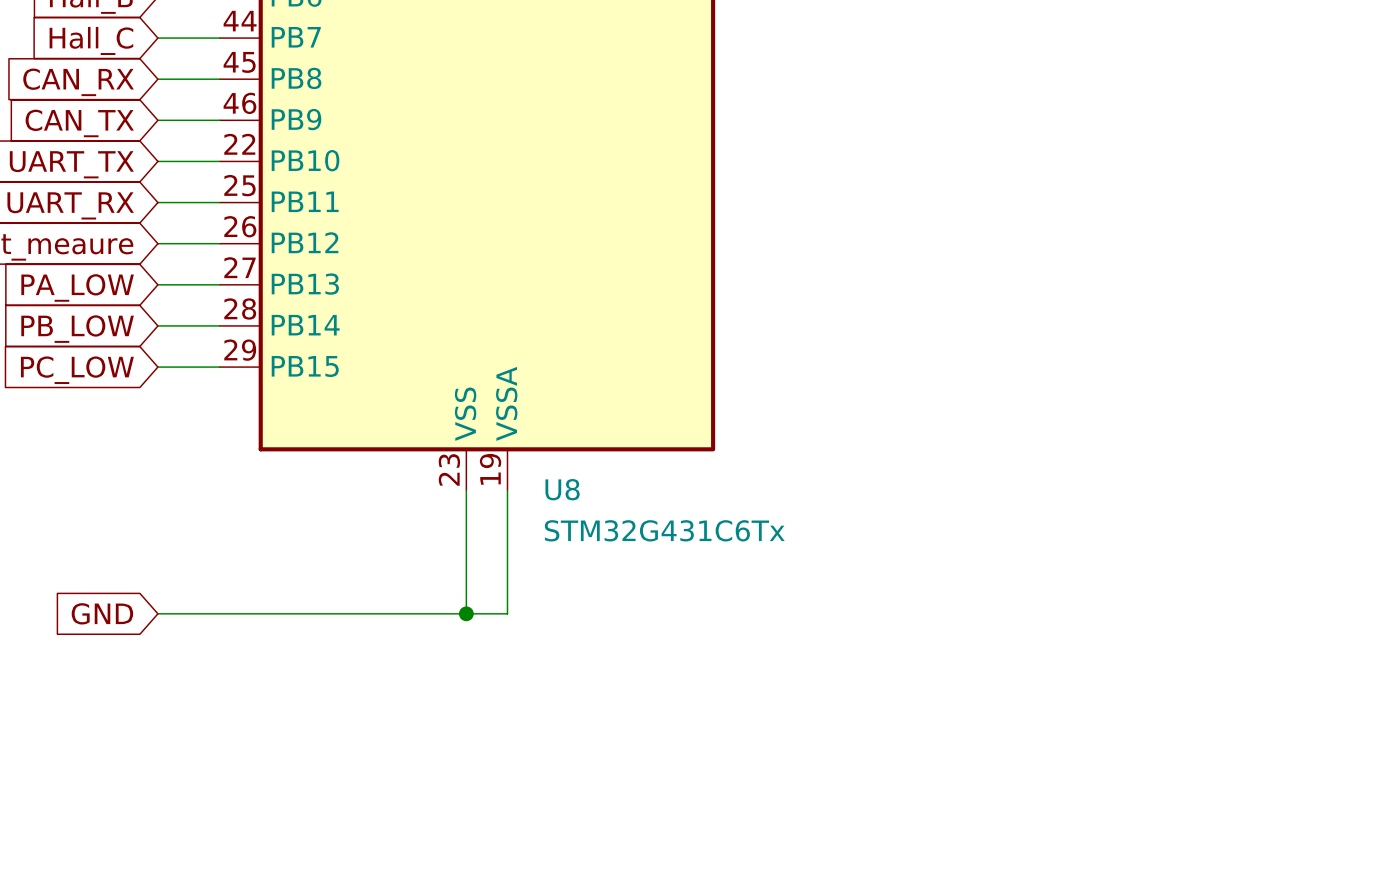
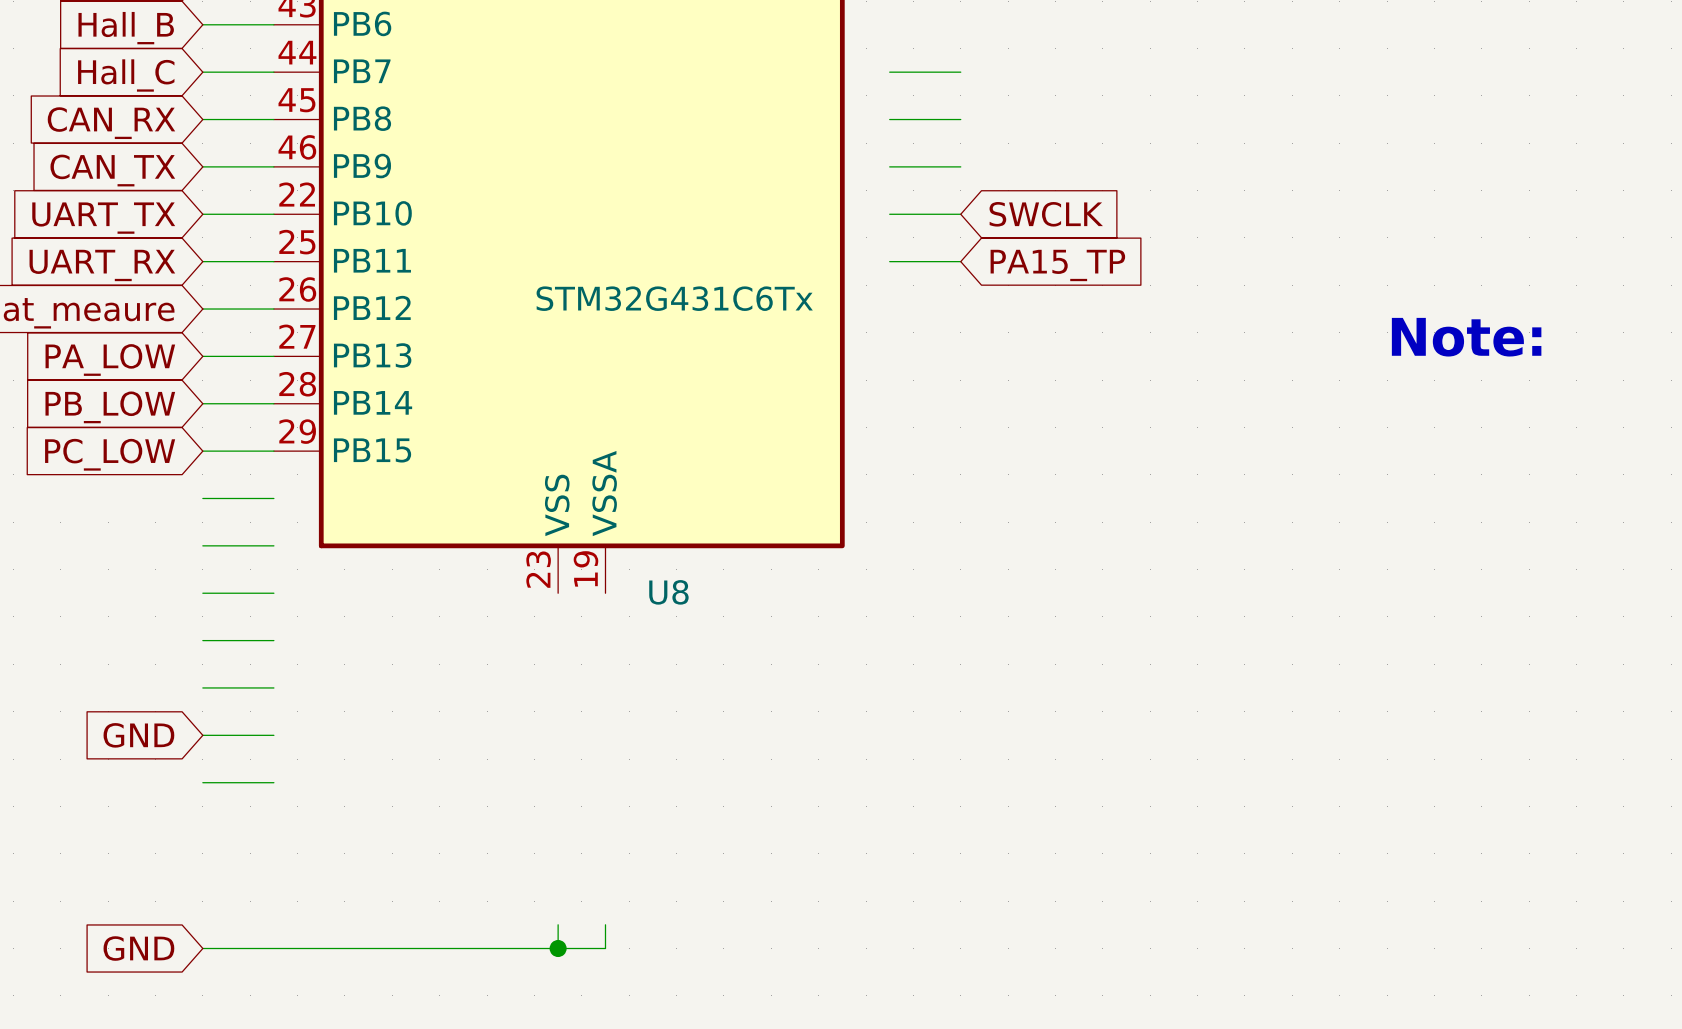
wire: none -> (889, 72) (960, 72)
wire: none -> (889, 119) (960, 119)
wire: none -> (889, 166) (960, 166)
wire: none -> (889, 214) (960, 214)
global label: none -> SWCLK (1046, 214)
wire: none -> (889, 261) (960, 261)
global label: none -> PA15_TP (1057, 265)
text: none -> Note: (1466, 337)
wire: none -> (202, 498) (273, 498)
wire: none -> (202, 545) (273, 545)
wire: none -> (202, 593) (273, 593)
wire: (466, 490) (466, 613) -> none
wire: (507, 490) (507, 613) (219, 613) -> none
U8 value position: STM32G431C6Tx (664, 530) -> STM32G431C6Tx (674, 298)
wire: none -> (202, 640) (273, 640)
wire: none -> (202, 687) (273, 687)
junction: (466, 613) -> none
wire: none -> (202, 782) (273, 782)
wire: none -> (558, 924) (558, 948)
wire: none -> (605, 924) (605, 948) (202, 948)
global label: none -> GND (138, 948)
junction: none -> (558, 948)

